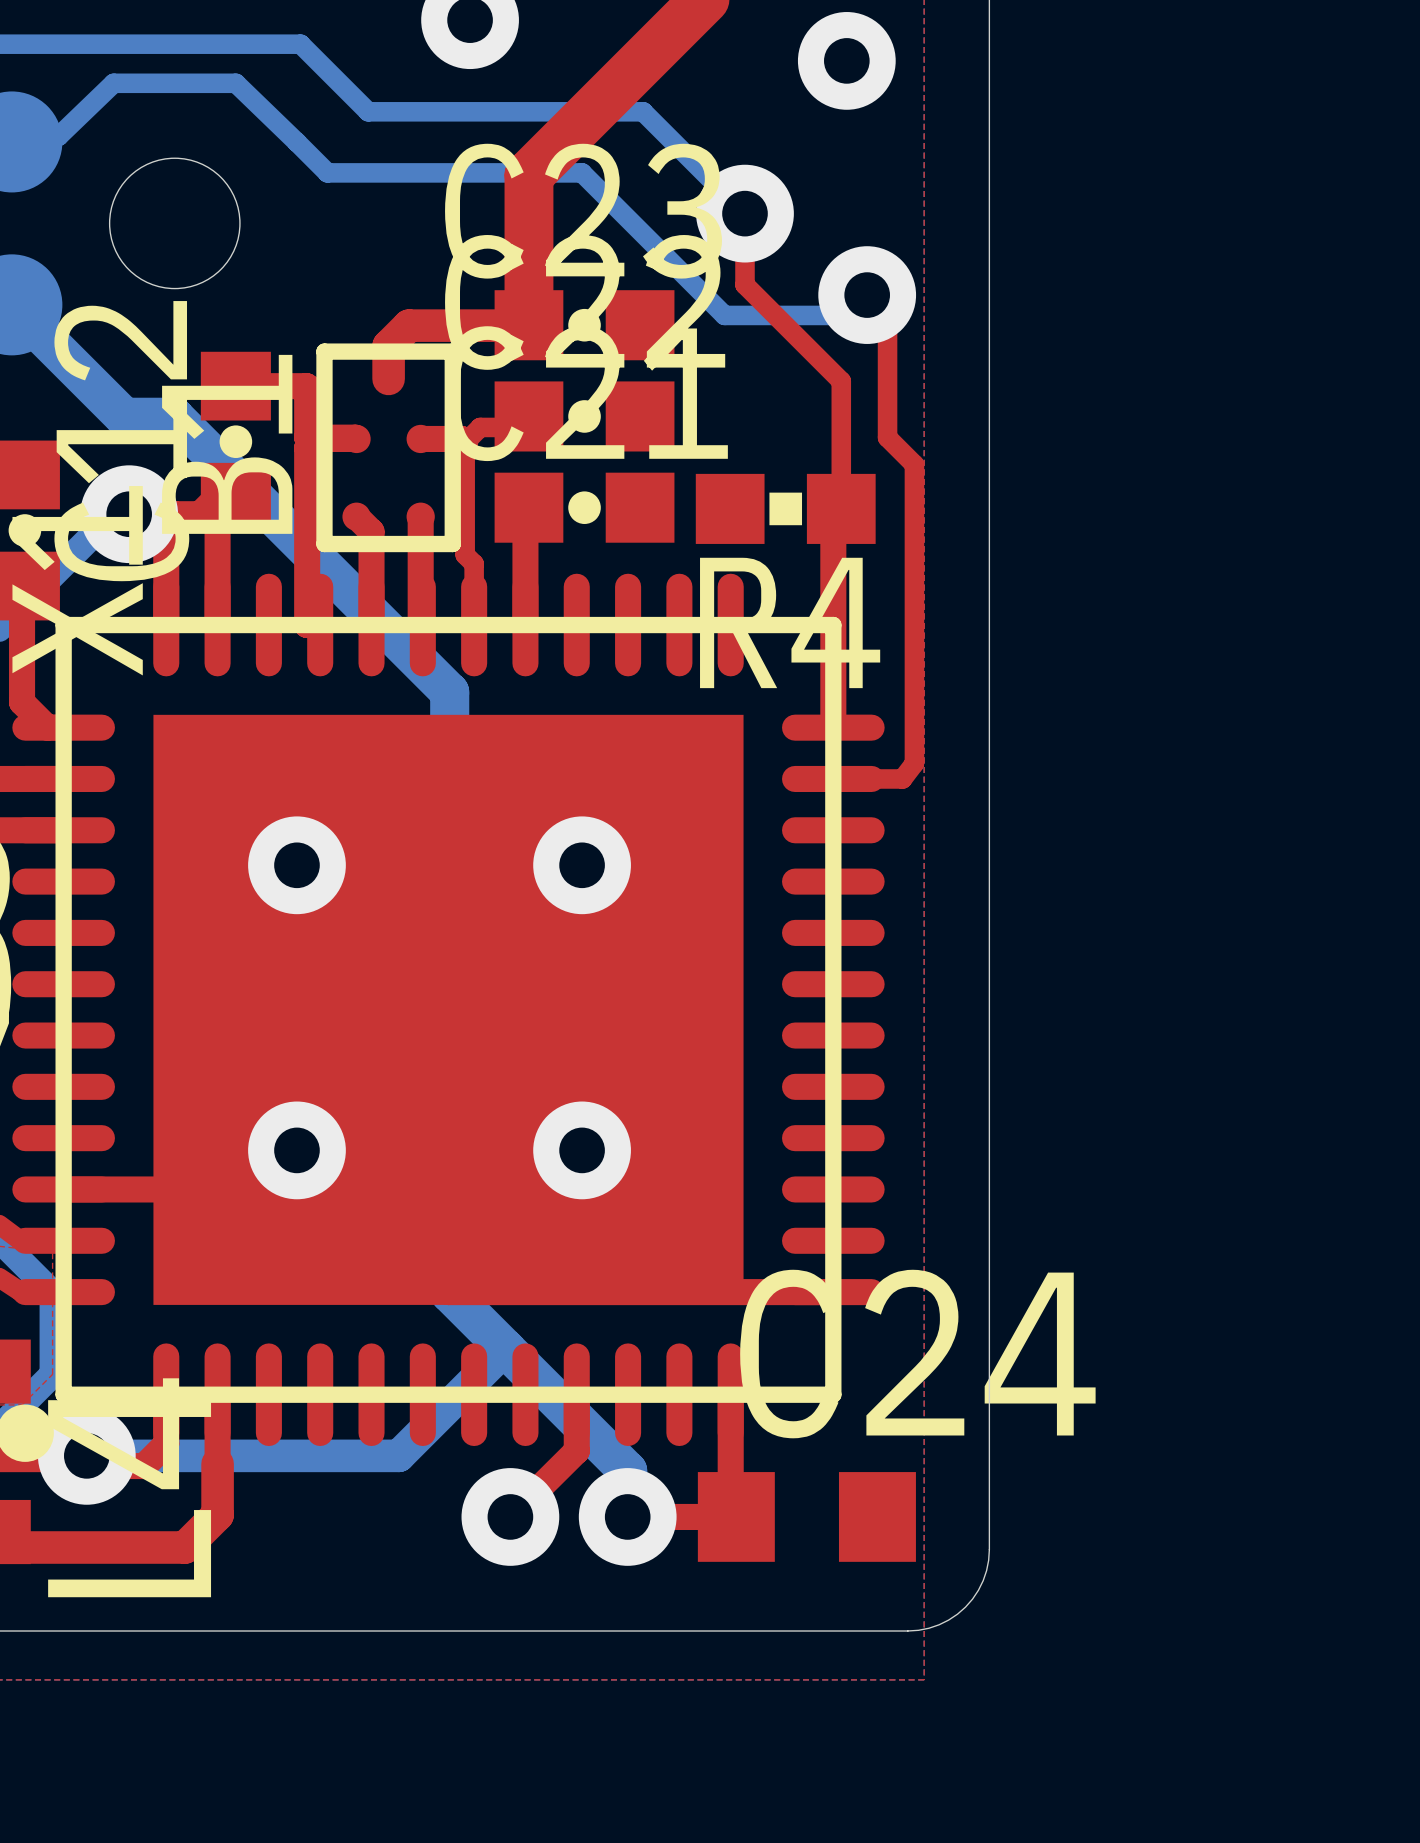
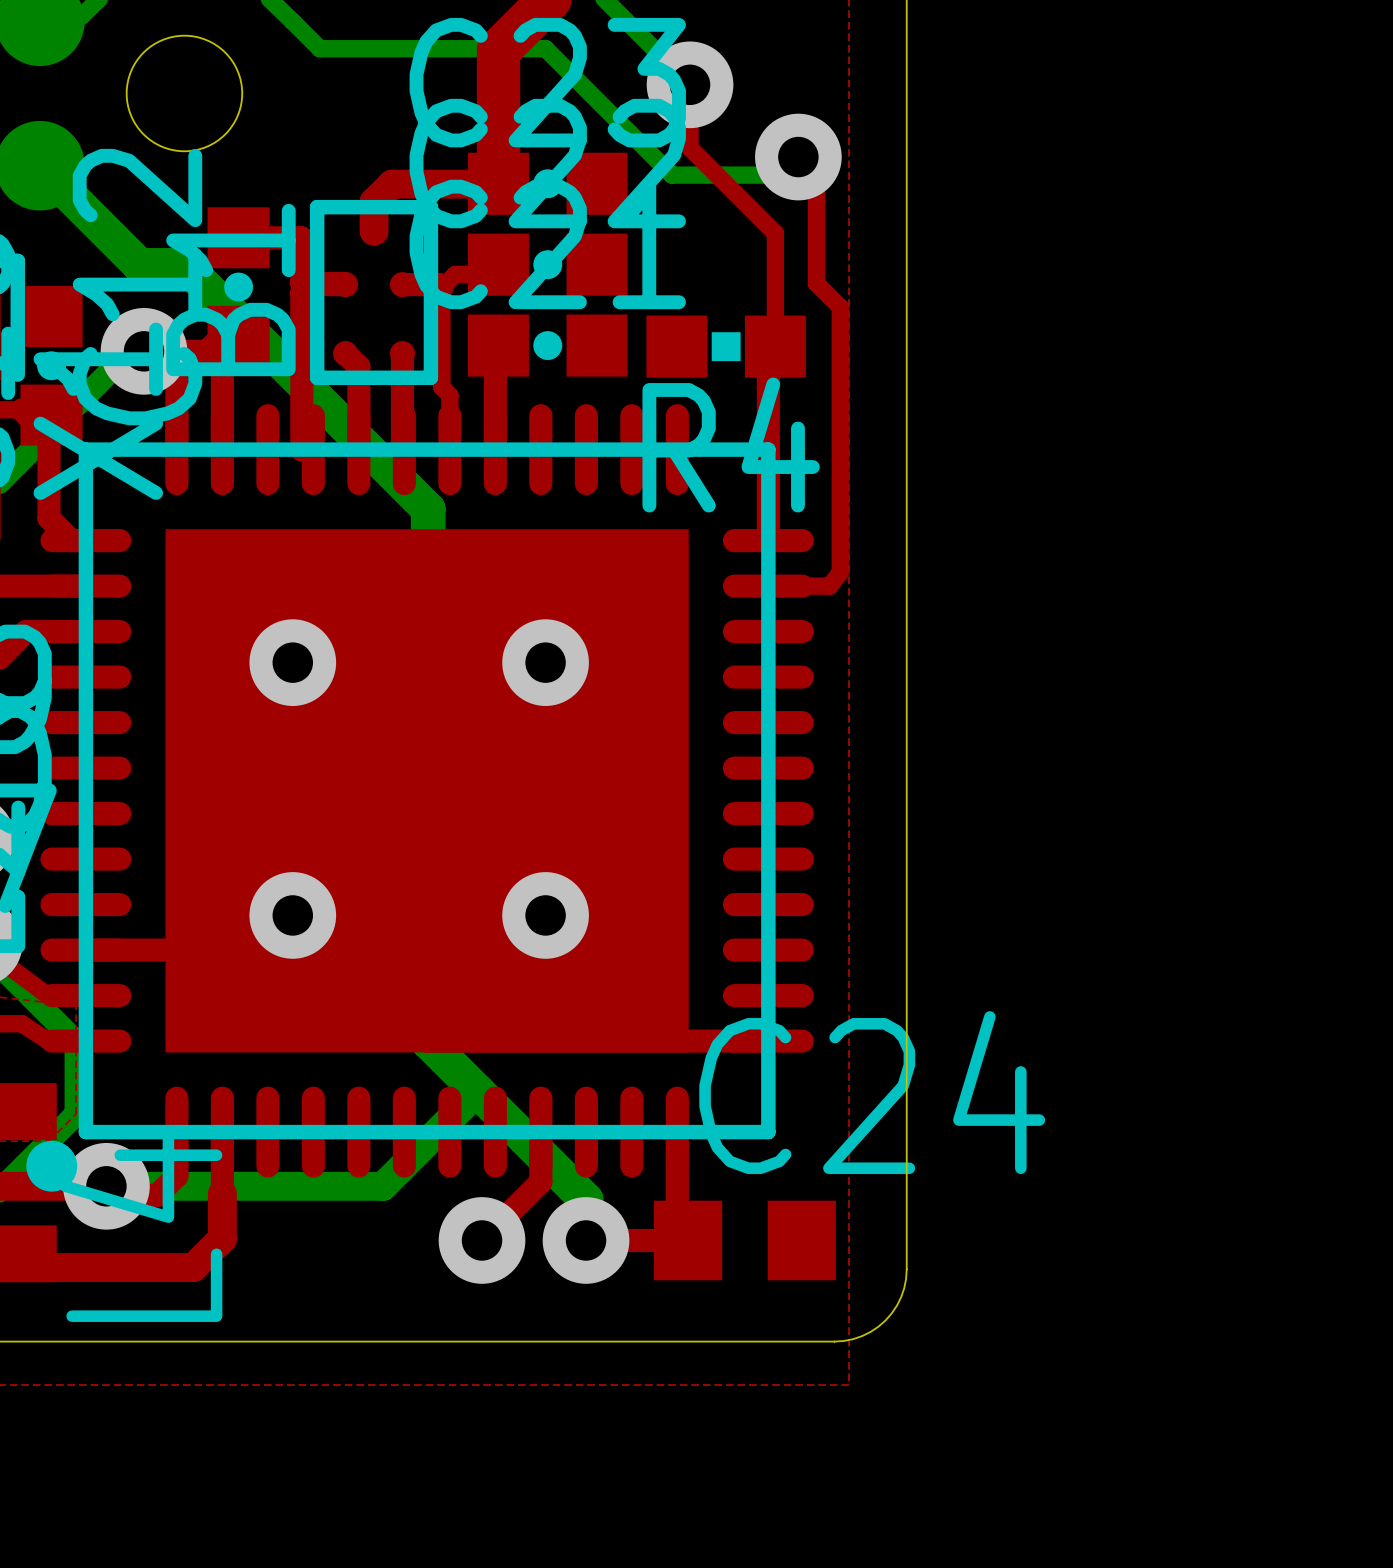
C24 footprint: [697, 1472, 916, 1562] -> [653, 1200, 836, 1281]

